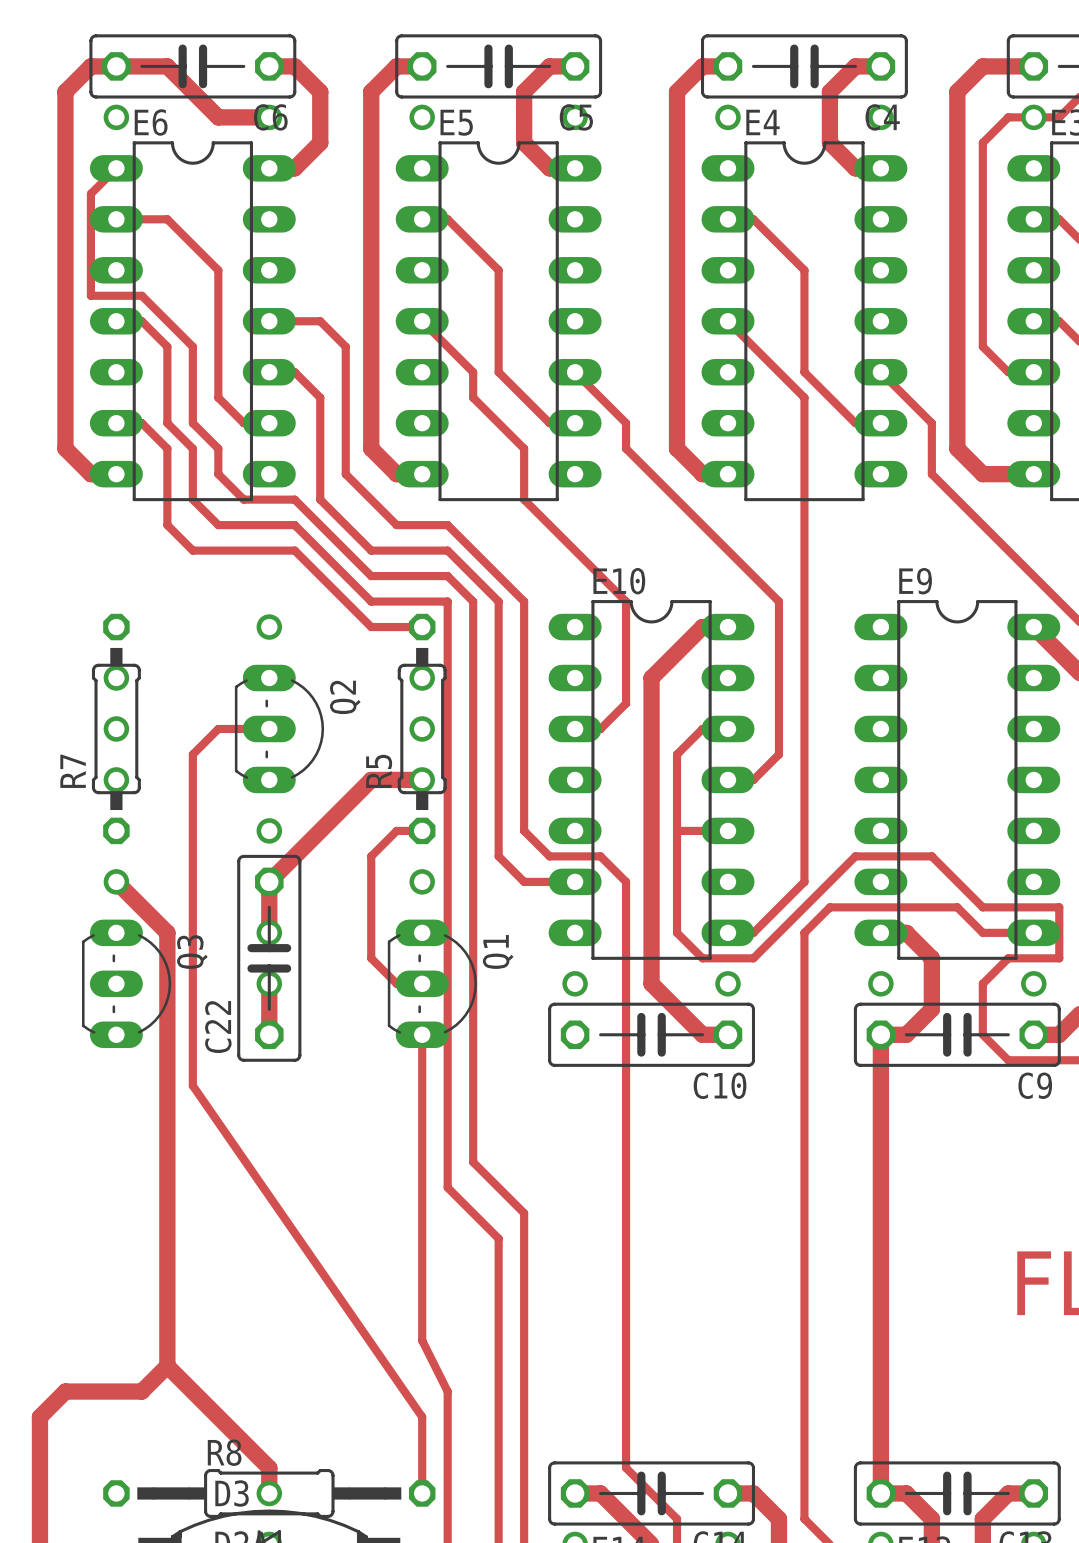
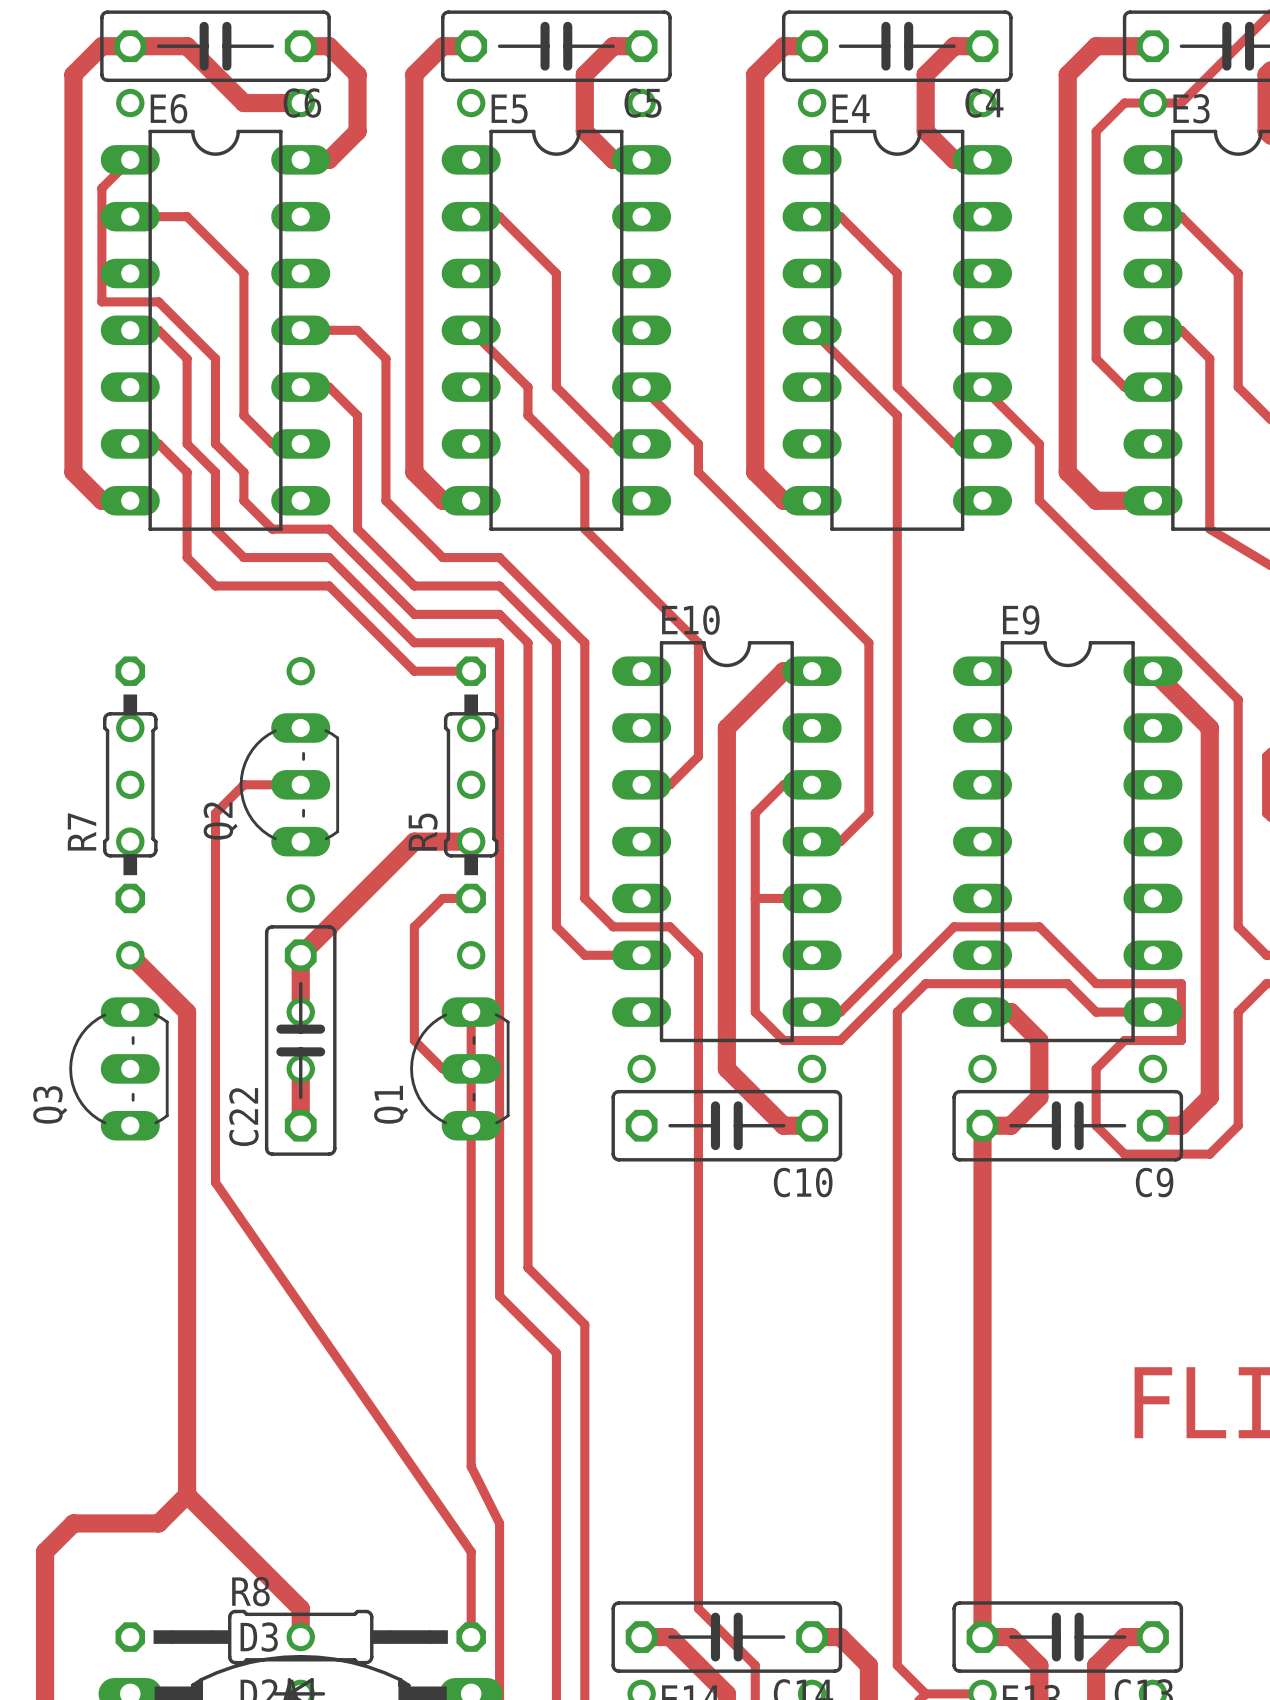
Q2 rotation: 0° (279, 728) -> 180° (289, 784)
track: none -> (471, 1012) (471, 1125)
Q3 rotation: 0° (126, 983) -> 180° (118, 1068)
Q1 rotation: 0° (432, 983) -> 180° (459, 1068)

